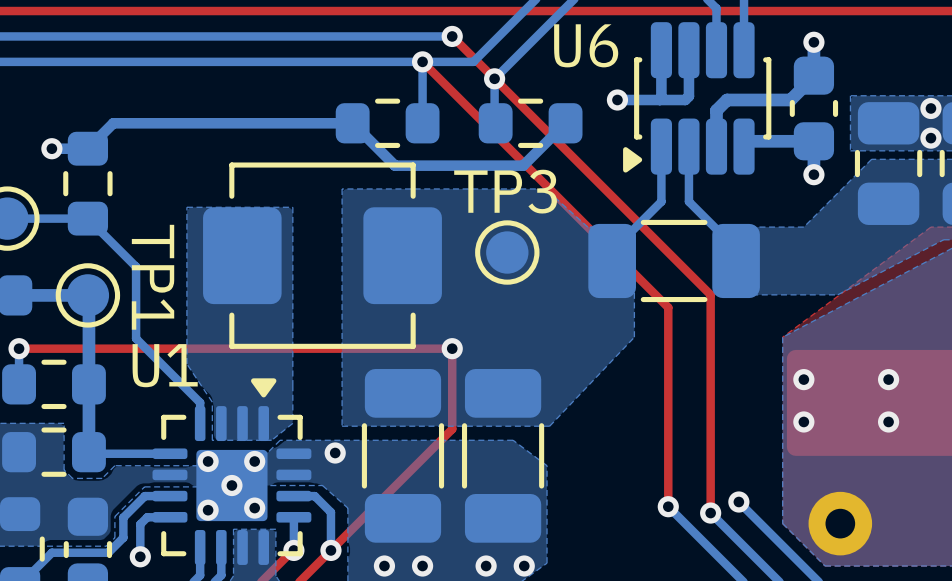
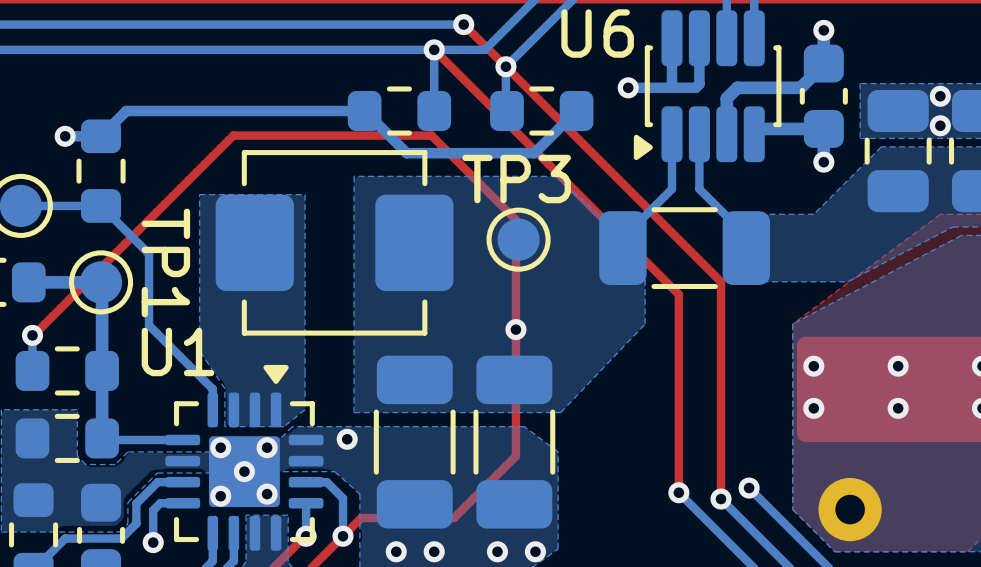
top track: (20, 348) (452, 348) (452, 429) (349, 532) -> (33, 335) (233, 135) (431, 135) (515, 219) (515, 456) (454, 518) (361, 518)
via position: (452, 348) -> (515, 329)

